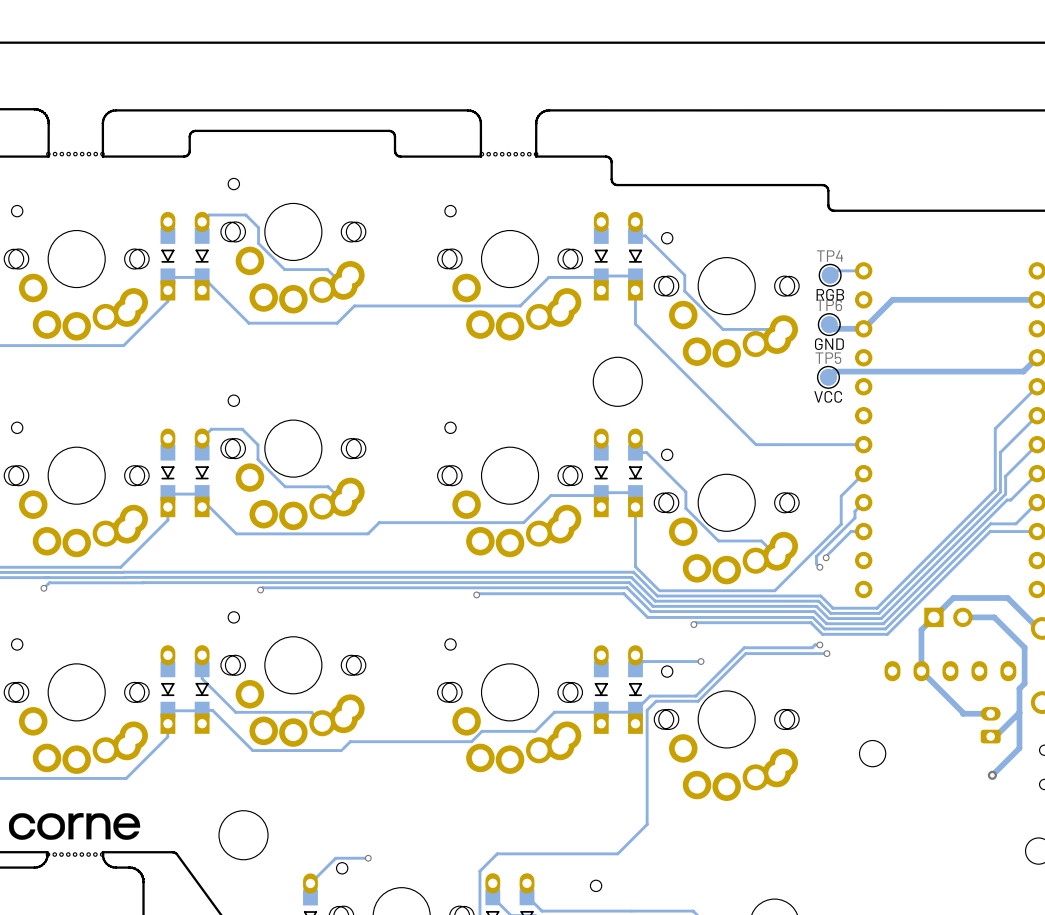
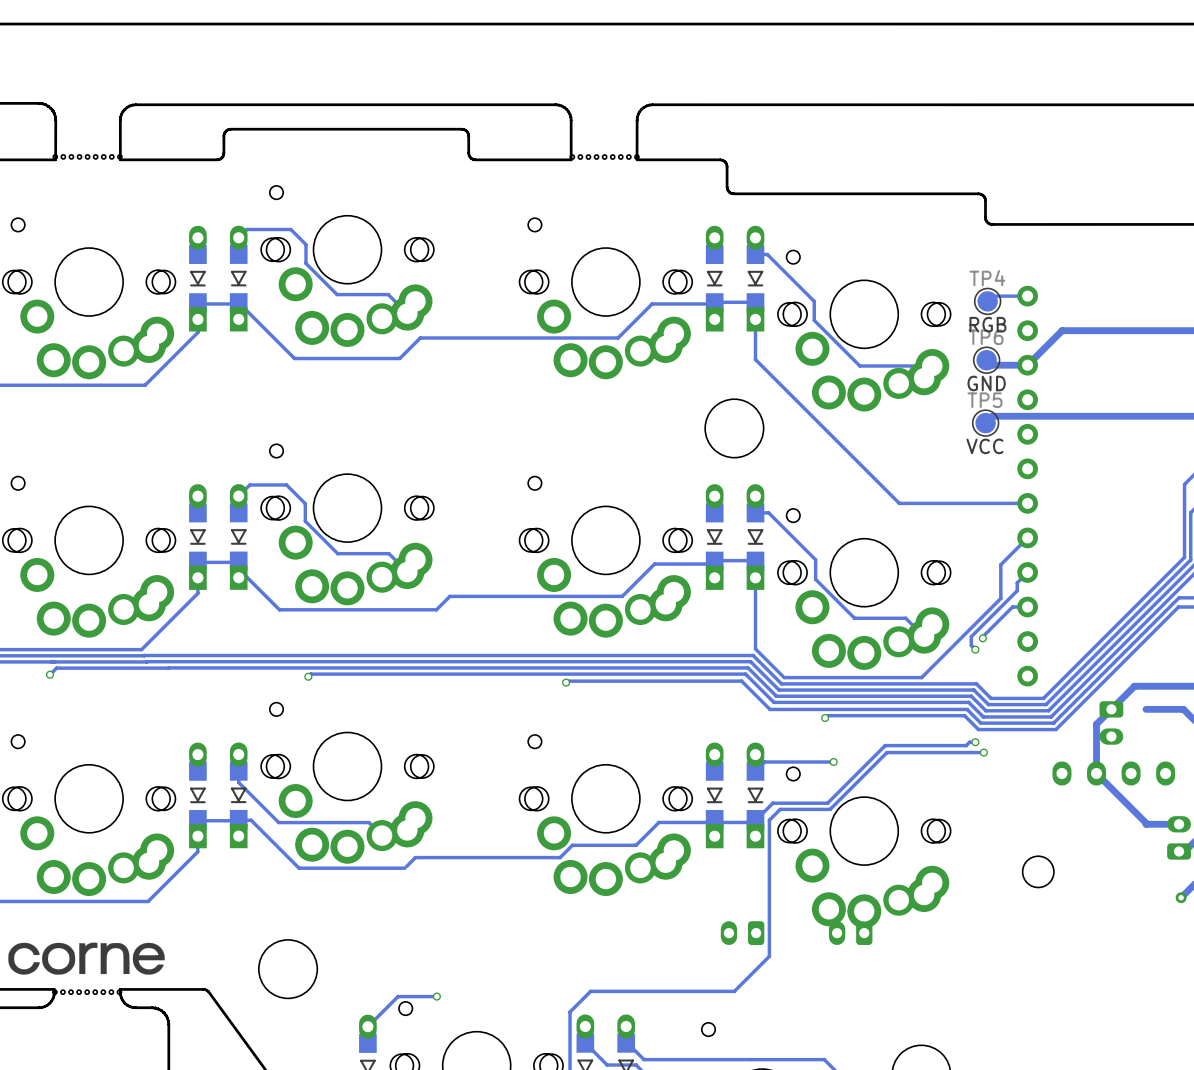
part: (948, 617) -> none
part: none -> (1111, 722)
part: none -> (742, 933)
part: none -> (850, 933)

